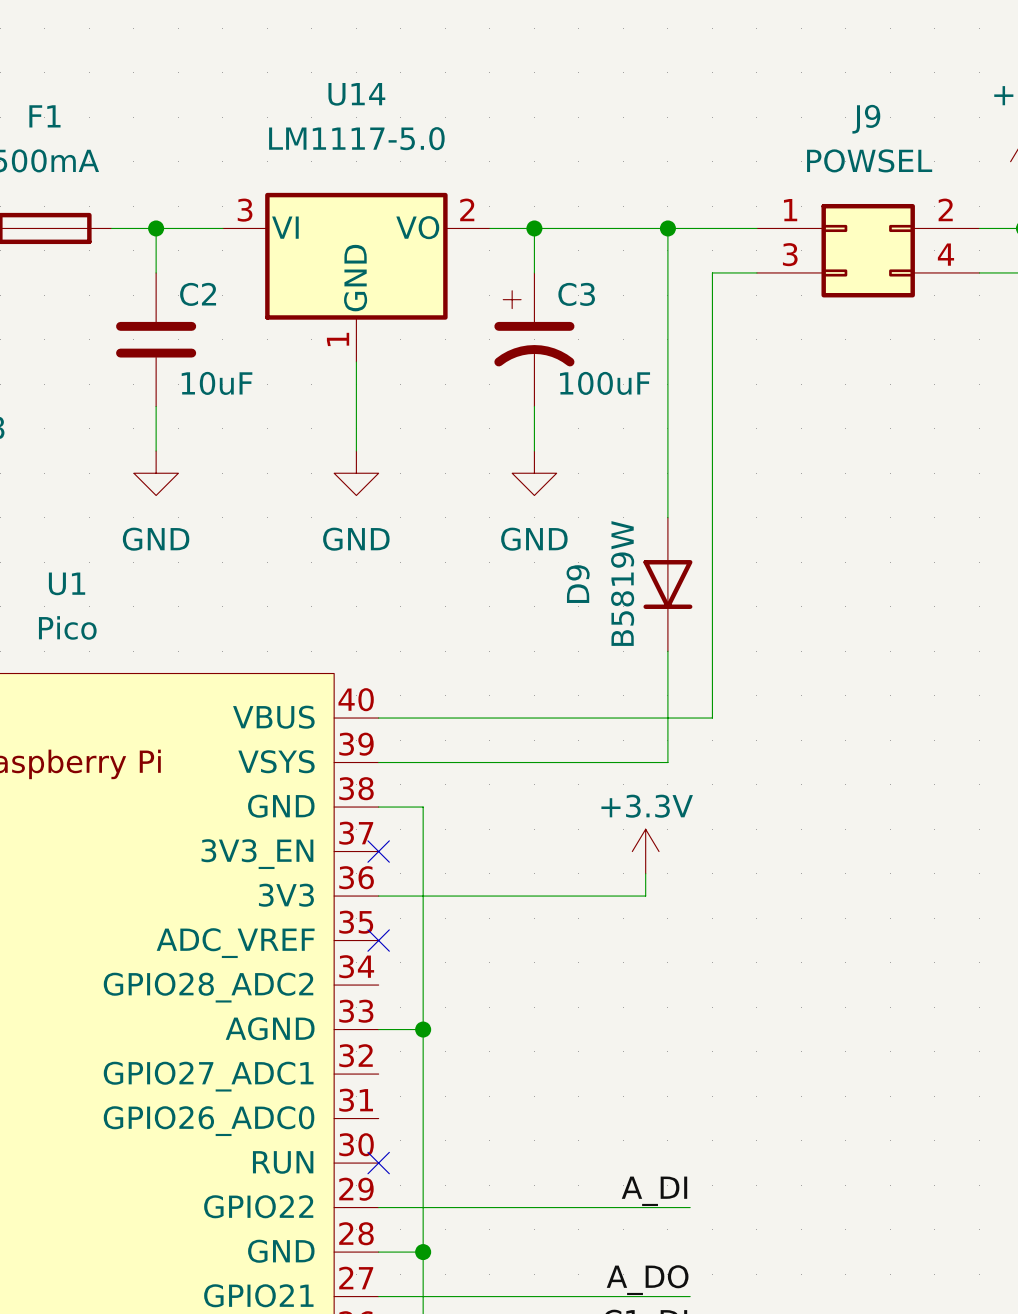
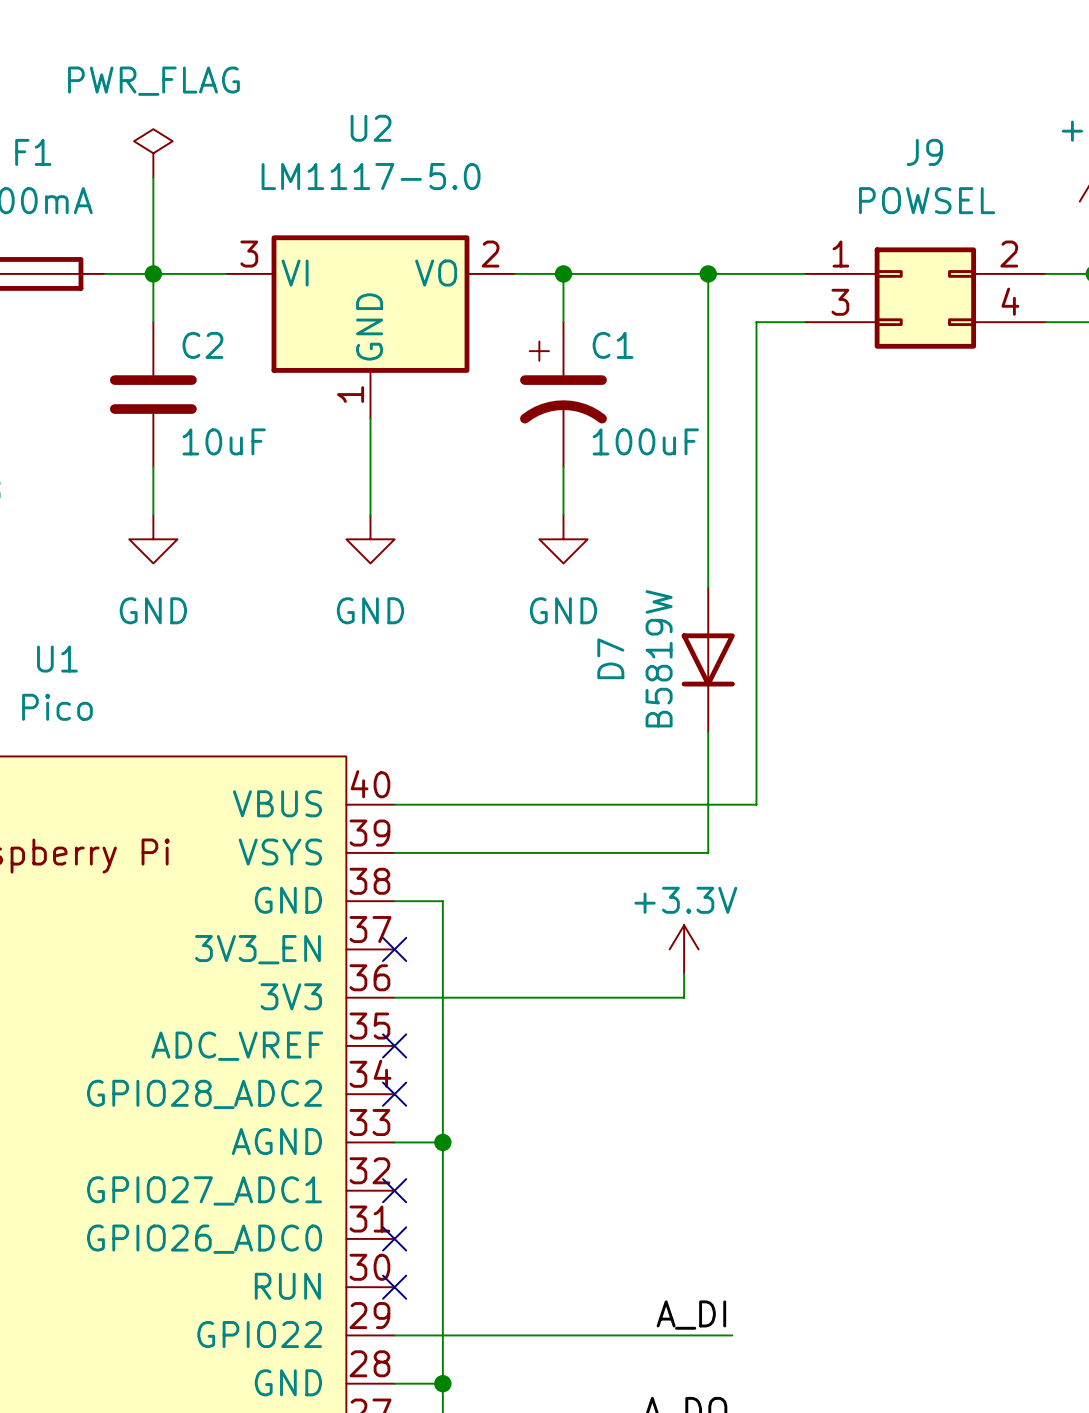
U14 name: U14 (356, 94) -> U2 (371, 128)
power symbol: none -> PWR_FLAG (153, 153)
wire: none -> (153, 177) (153, 273)
C3 name: C3 (576, 294) -> C1 (613, 345)
D9 name: D9 (578, 584) -> D7 (610, 658)
no-connect mark: none -> (394, 1094)
no-connect mark: none -> (394, 1190)
no-connect mark: none -> (394, 1238)

